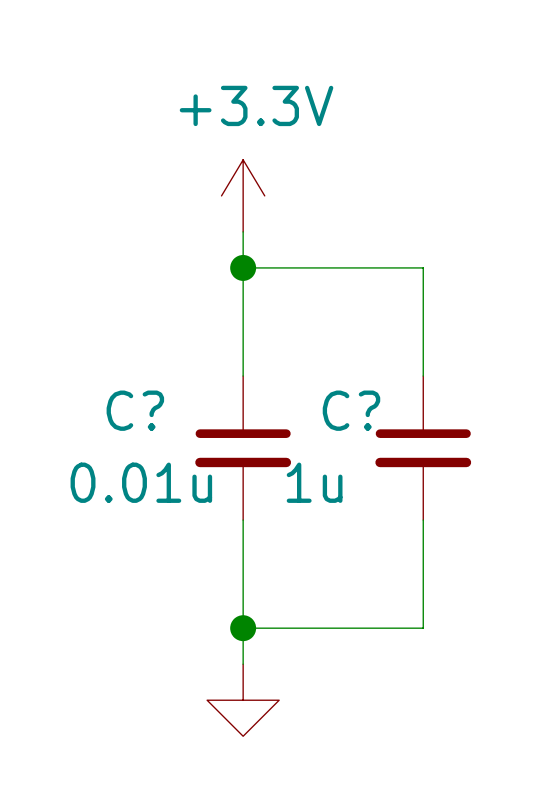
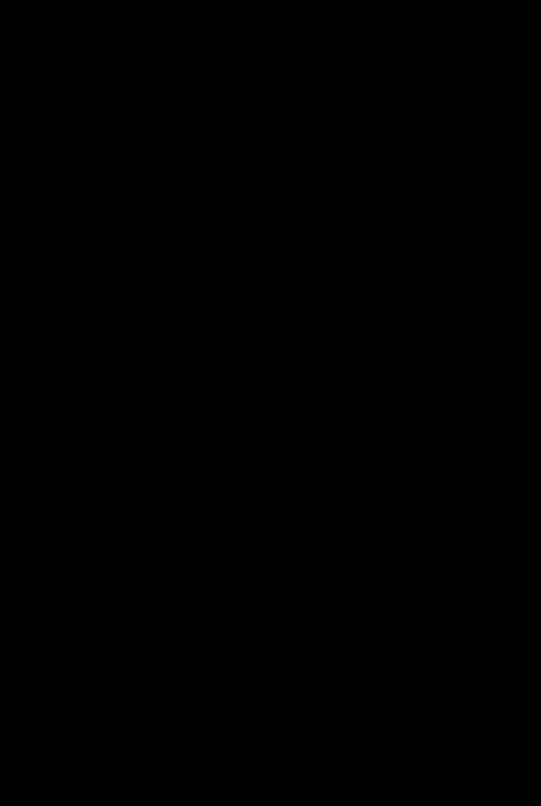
power symbol: +3.3V (243, 195) -> none
wire: (243, 231) (243, 376) -> none
wire: (243, 267) (423, 267) (423, 376) -> none
junction: (243, 267) -> none
C?: 0.01u (243, 448) -> none
C?: 1u (423, 448) -> none
wire: (243, 520) (243, 664) -> none
wire: (423, 520) (423, 628) (243, 628) -> none
junction: (243, 628) -> none
power symbol: (243, 700) -> none

